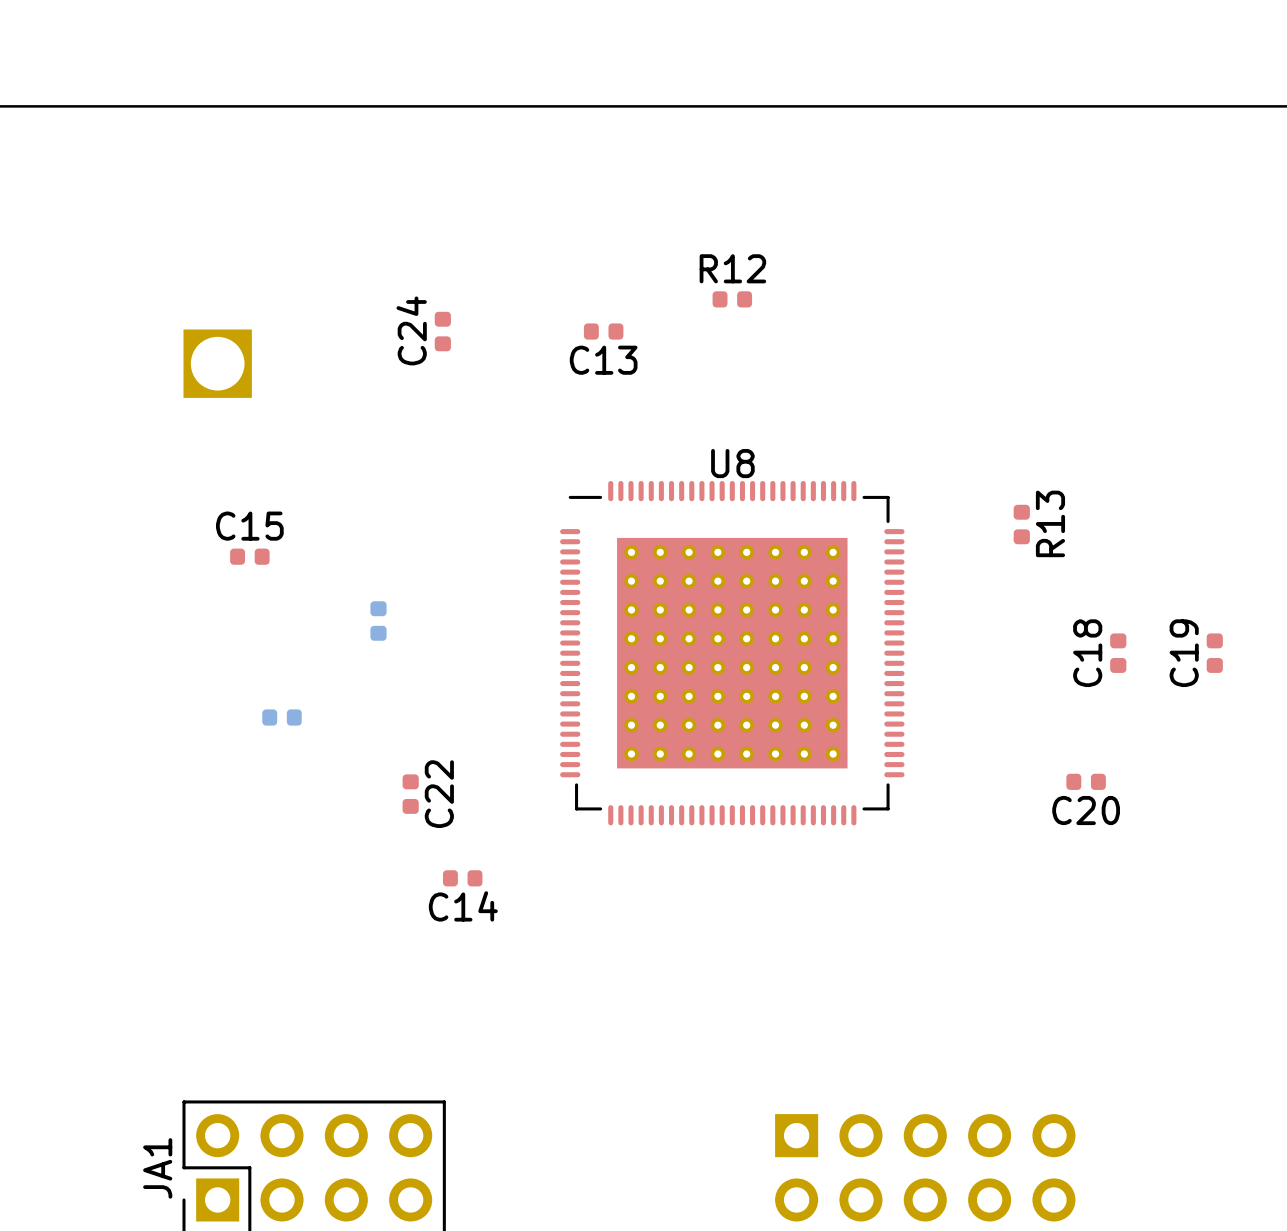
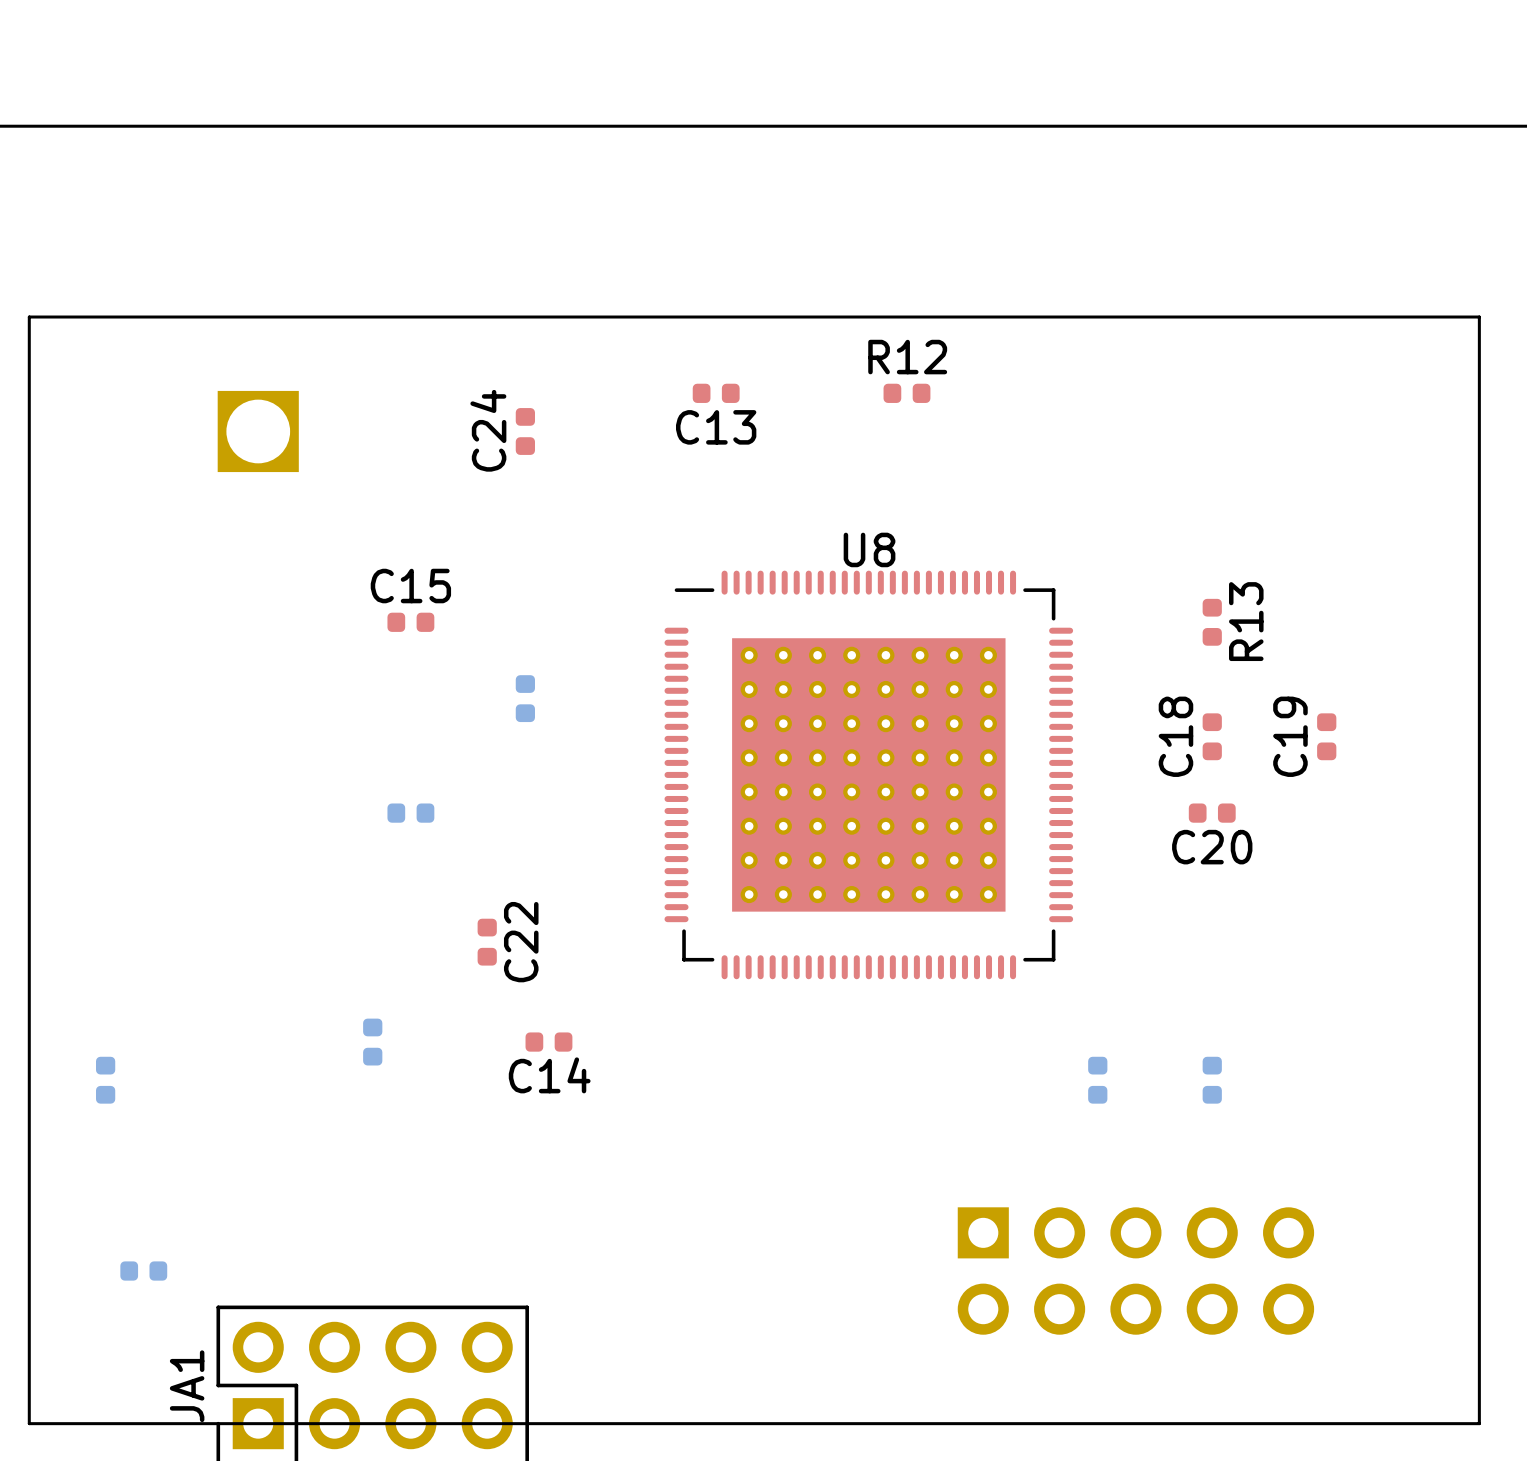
board edge: none -> (29, 317) (1479, 317) (1479, 1423) (29, 1423) (29, 317)
R12 position: (732, 299) -> (906, 393)
C24 position: (442, 331) -> (525, 431)
C15 position: (249, 556) -> (410, 622)
part: none -> (525, 698)
part: (378, 621) -> none
C18 position: (1118, 653) -> (1212, 736)
C19 position: (1214, 653) -> (1326, 736)
part: none -> (410, 813)
part: (282, 717) -> none
C20 position: (1086, 781) -> (1212, 813)
part: none -> (372, 1042)
part: none -> (105, 1080)
part: none -> (1097, 1080)
part: none -> (1212, 1080)
part: none -> (143, 1271)
part position: (925, 1167) -> (1135, 1271)

